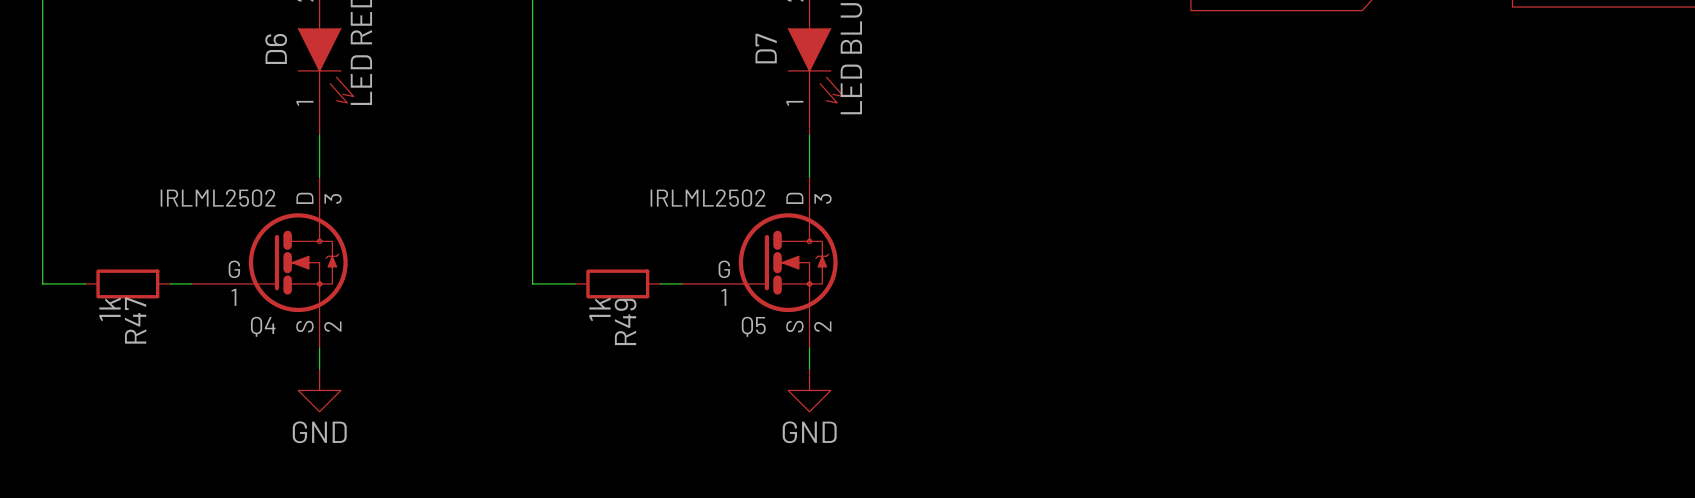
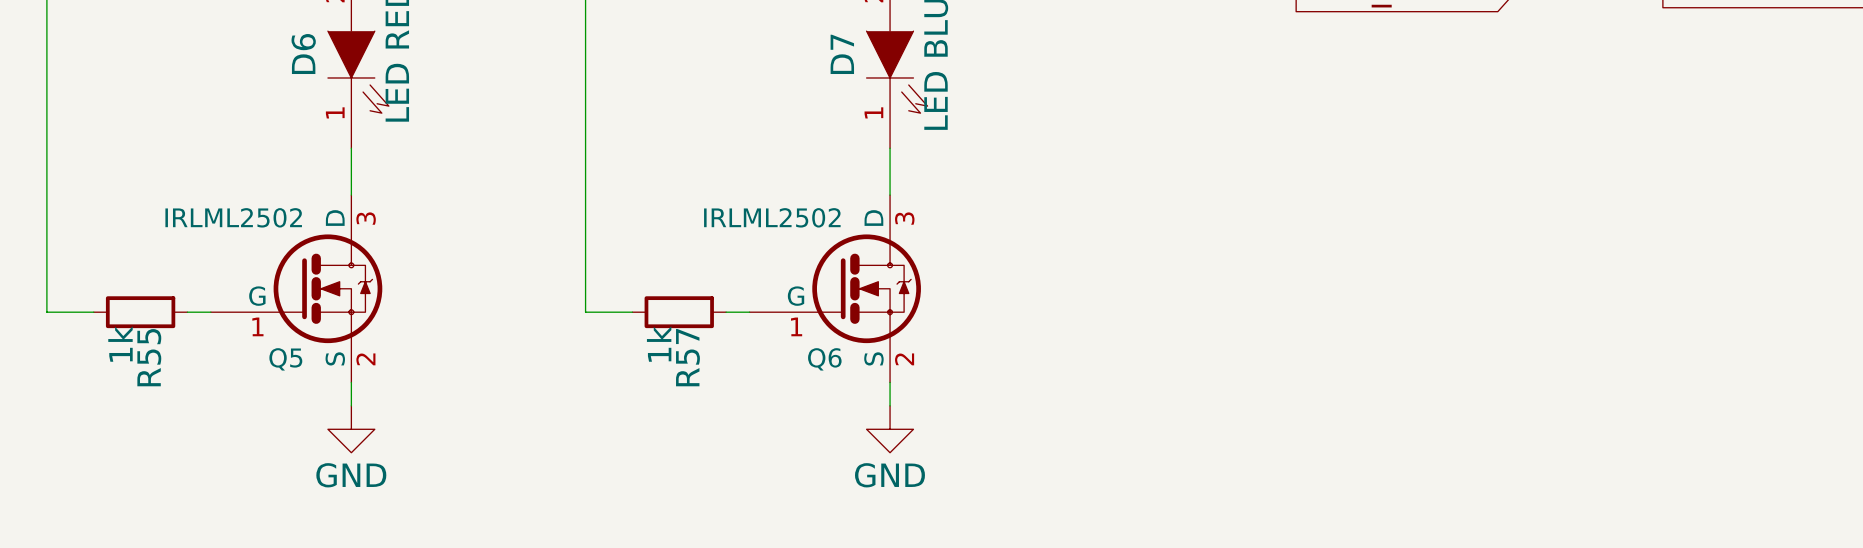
R47 name: R47 (135, 320) -> R55 (149, 357)
R49 name: R49 (625, 321) -> R57 (687, 357)
Q4 name: Q4 (263, 326) -> Q5 (285, 359)
Q5 name: Q5 (753, 326) -> Q6 (824, 359)

